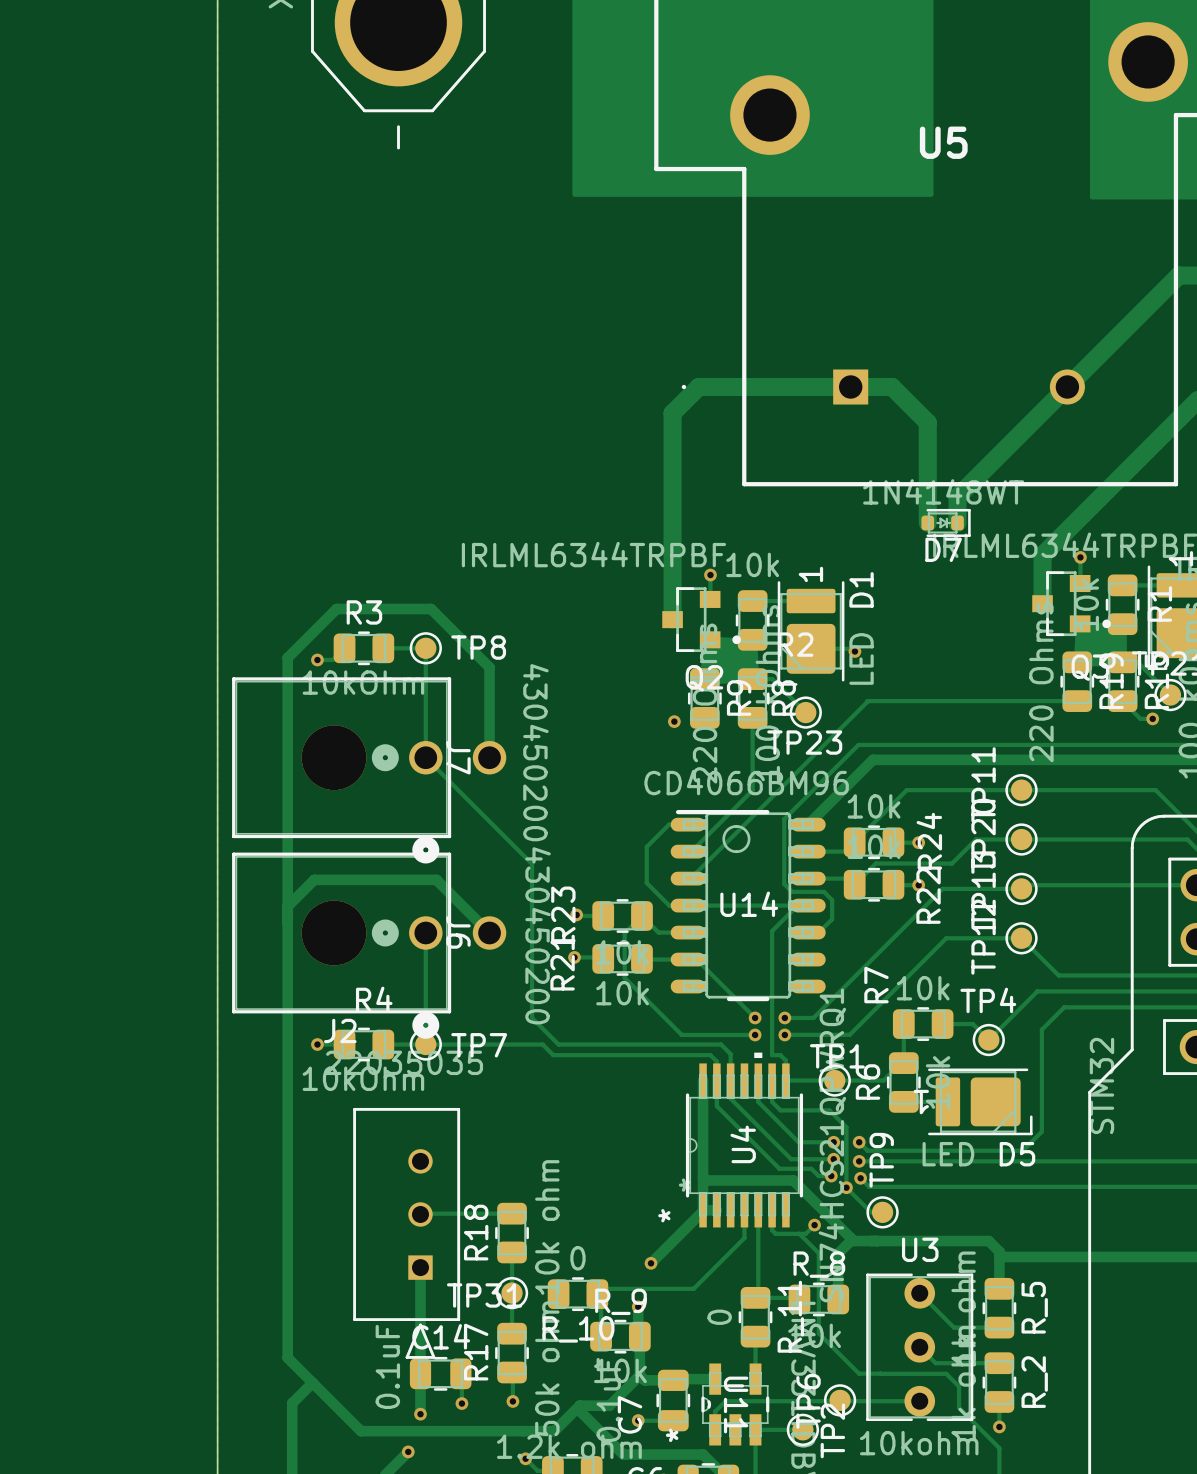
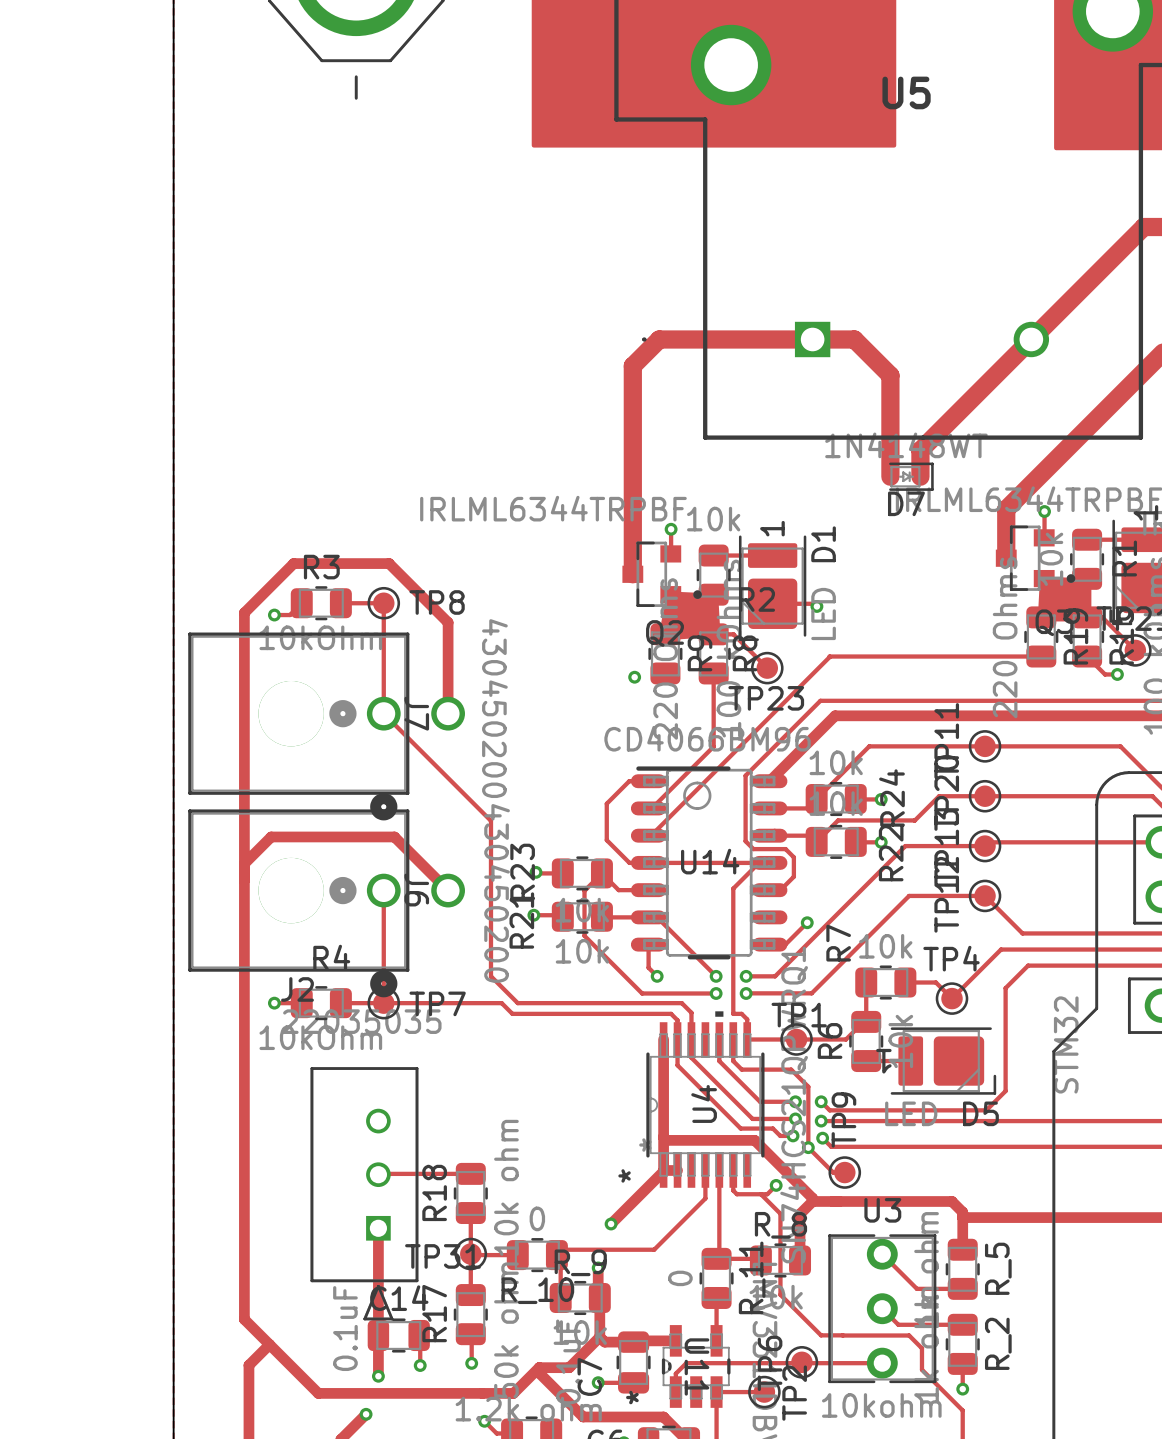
track: none -> (807, 922) (785, 944) (769, 944)
via: none -> (807, 922)
track: none -> (648, 944) (648, 967) (657, 976)
via: none -> (657, 976)
track: none -> (471, 1255) (517, 1255)

